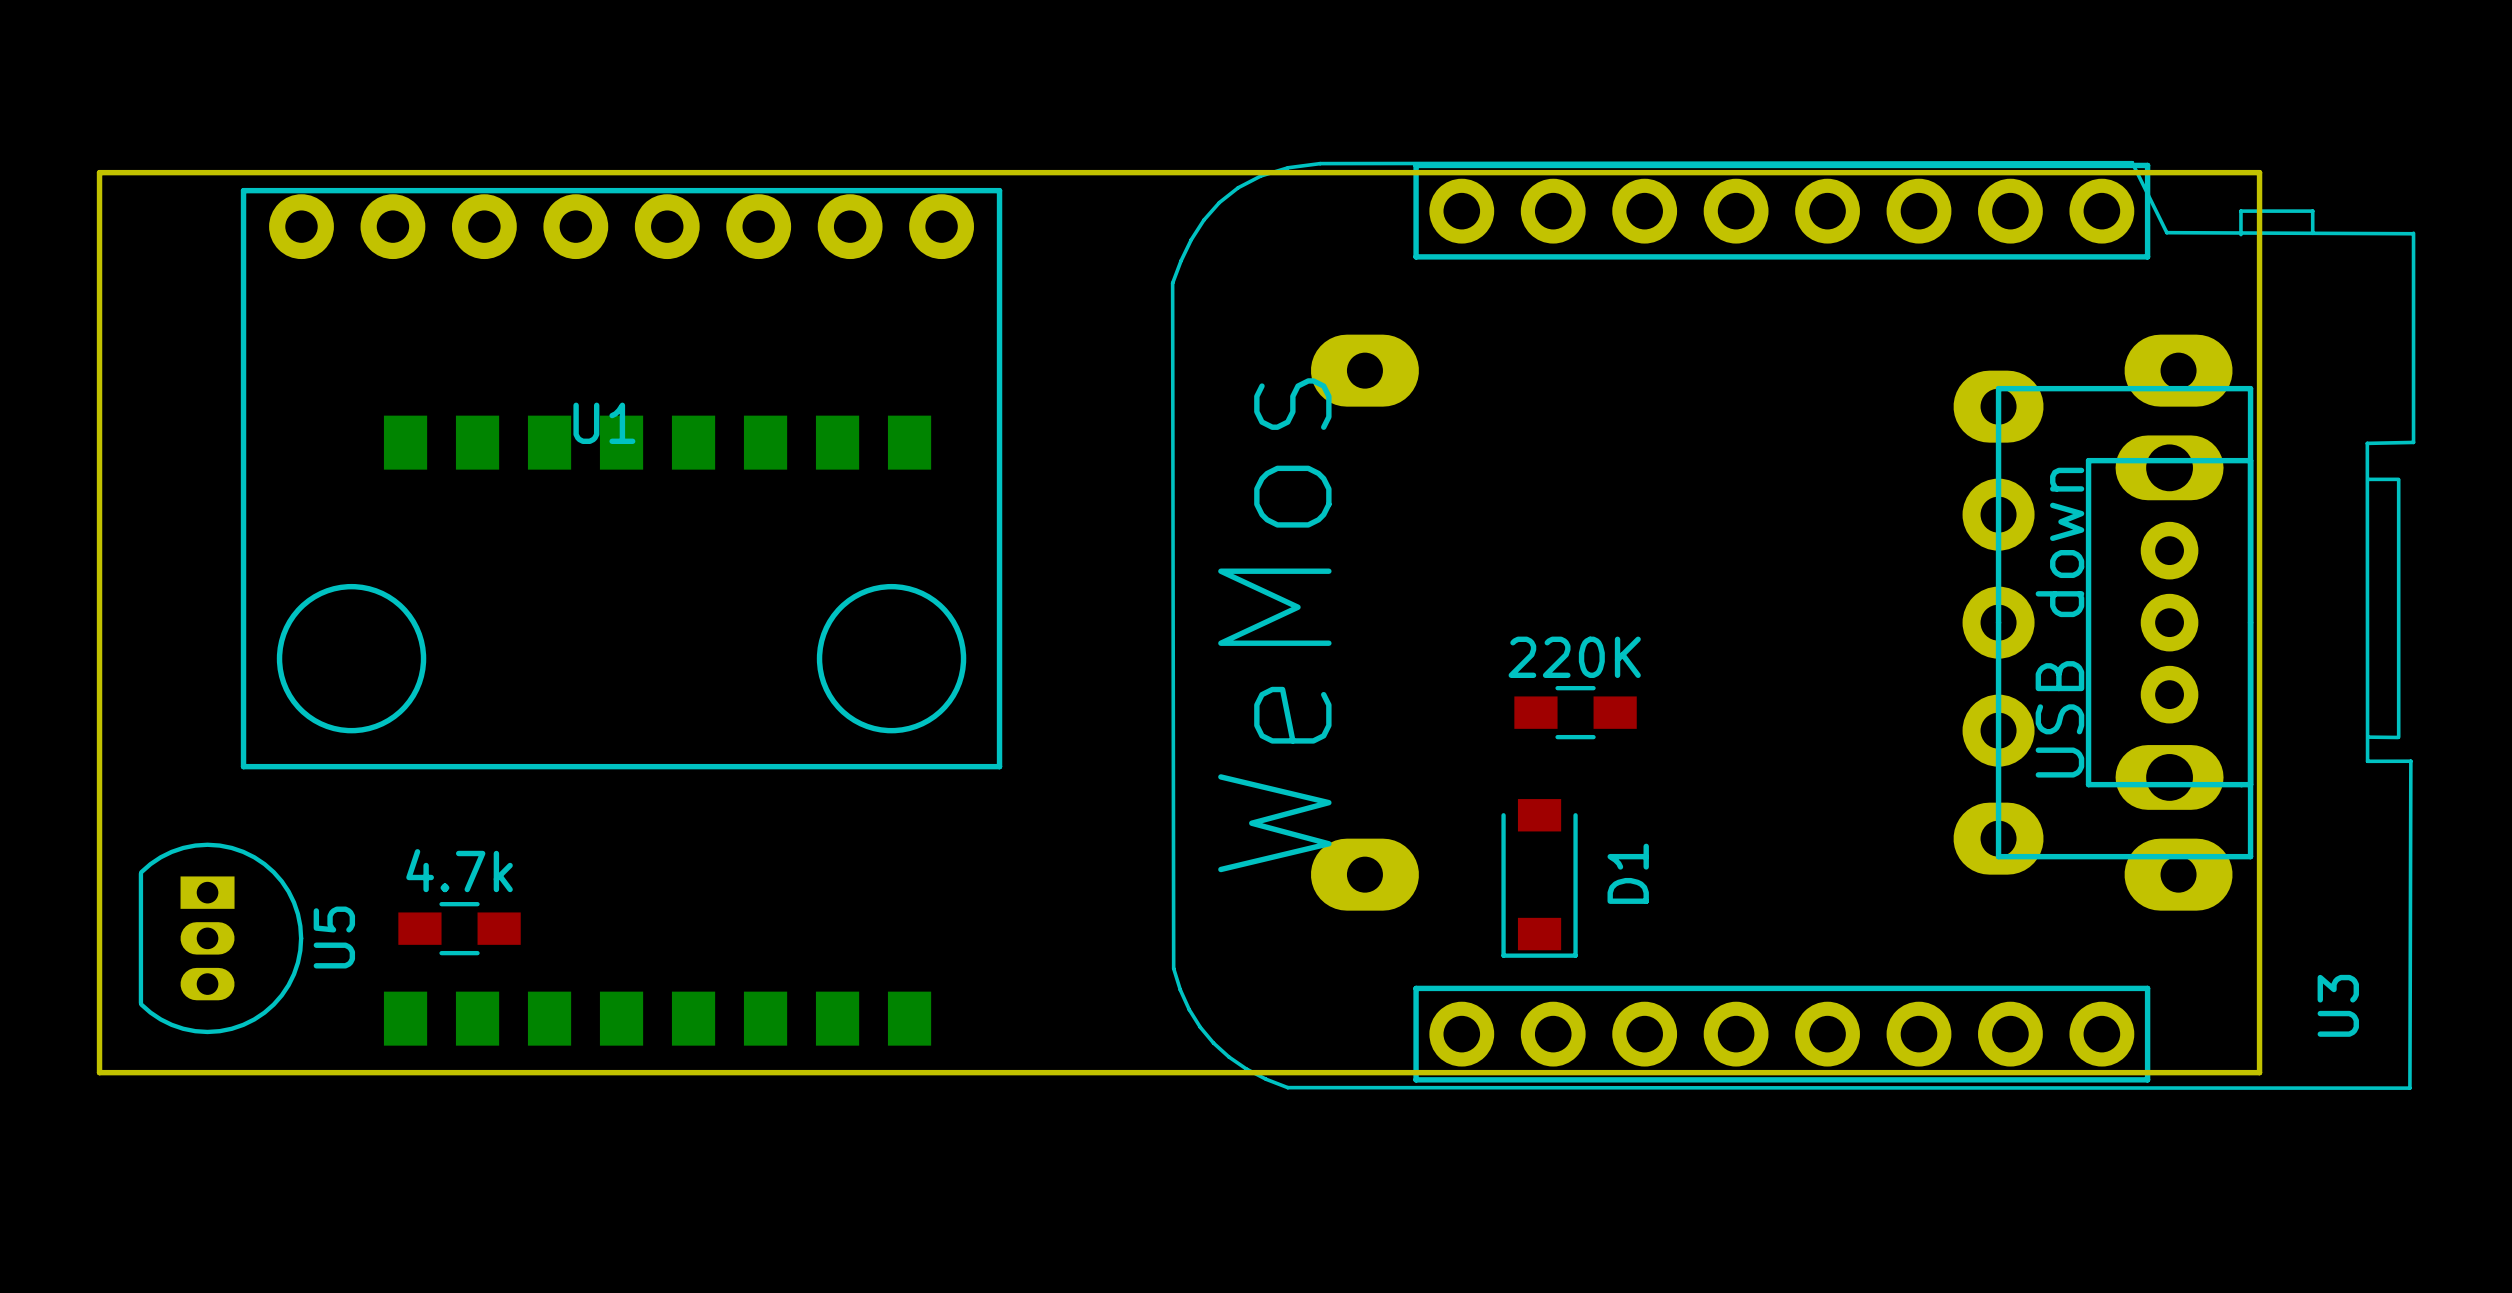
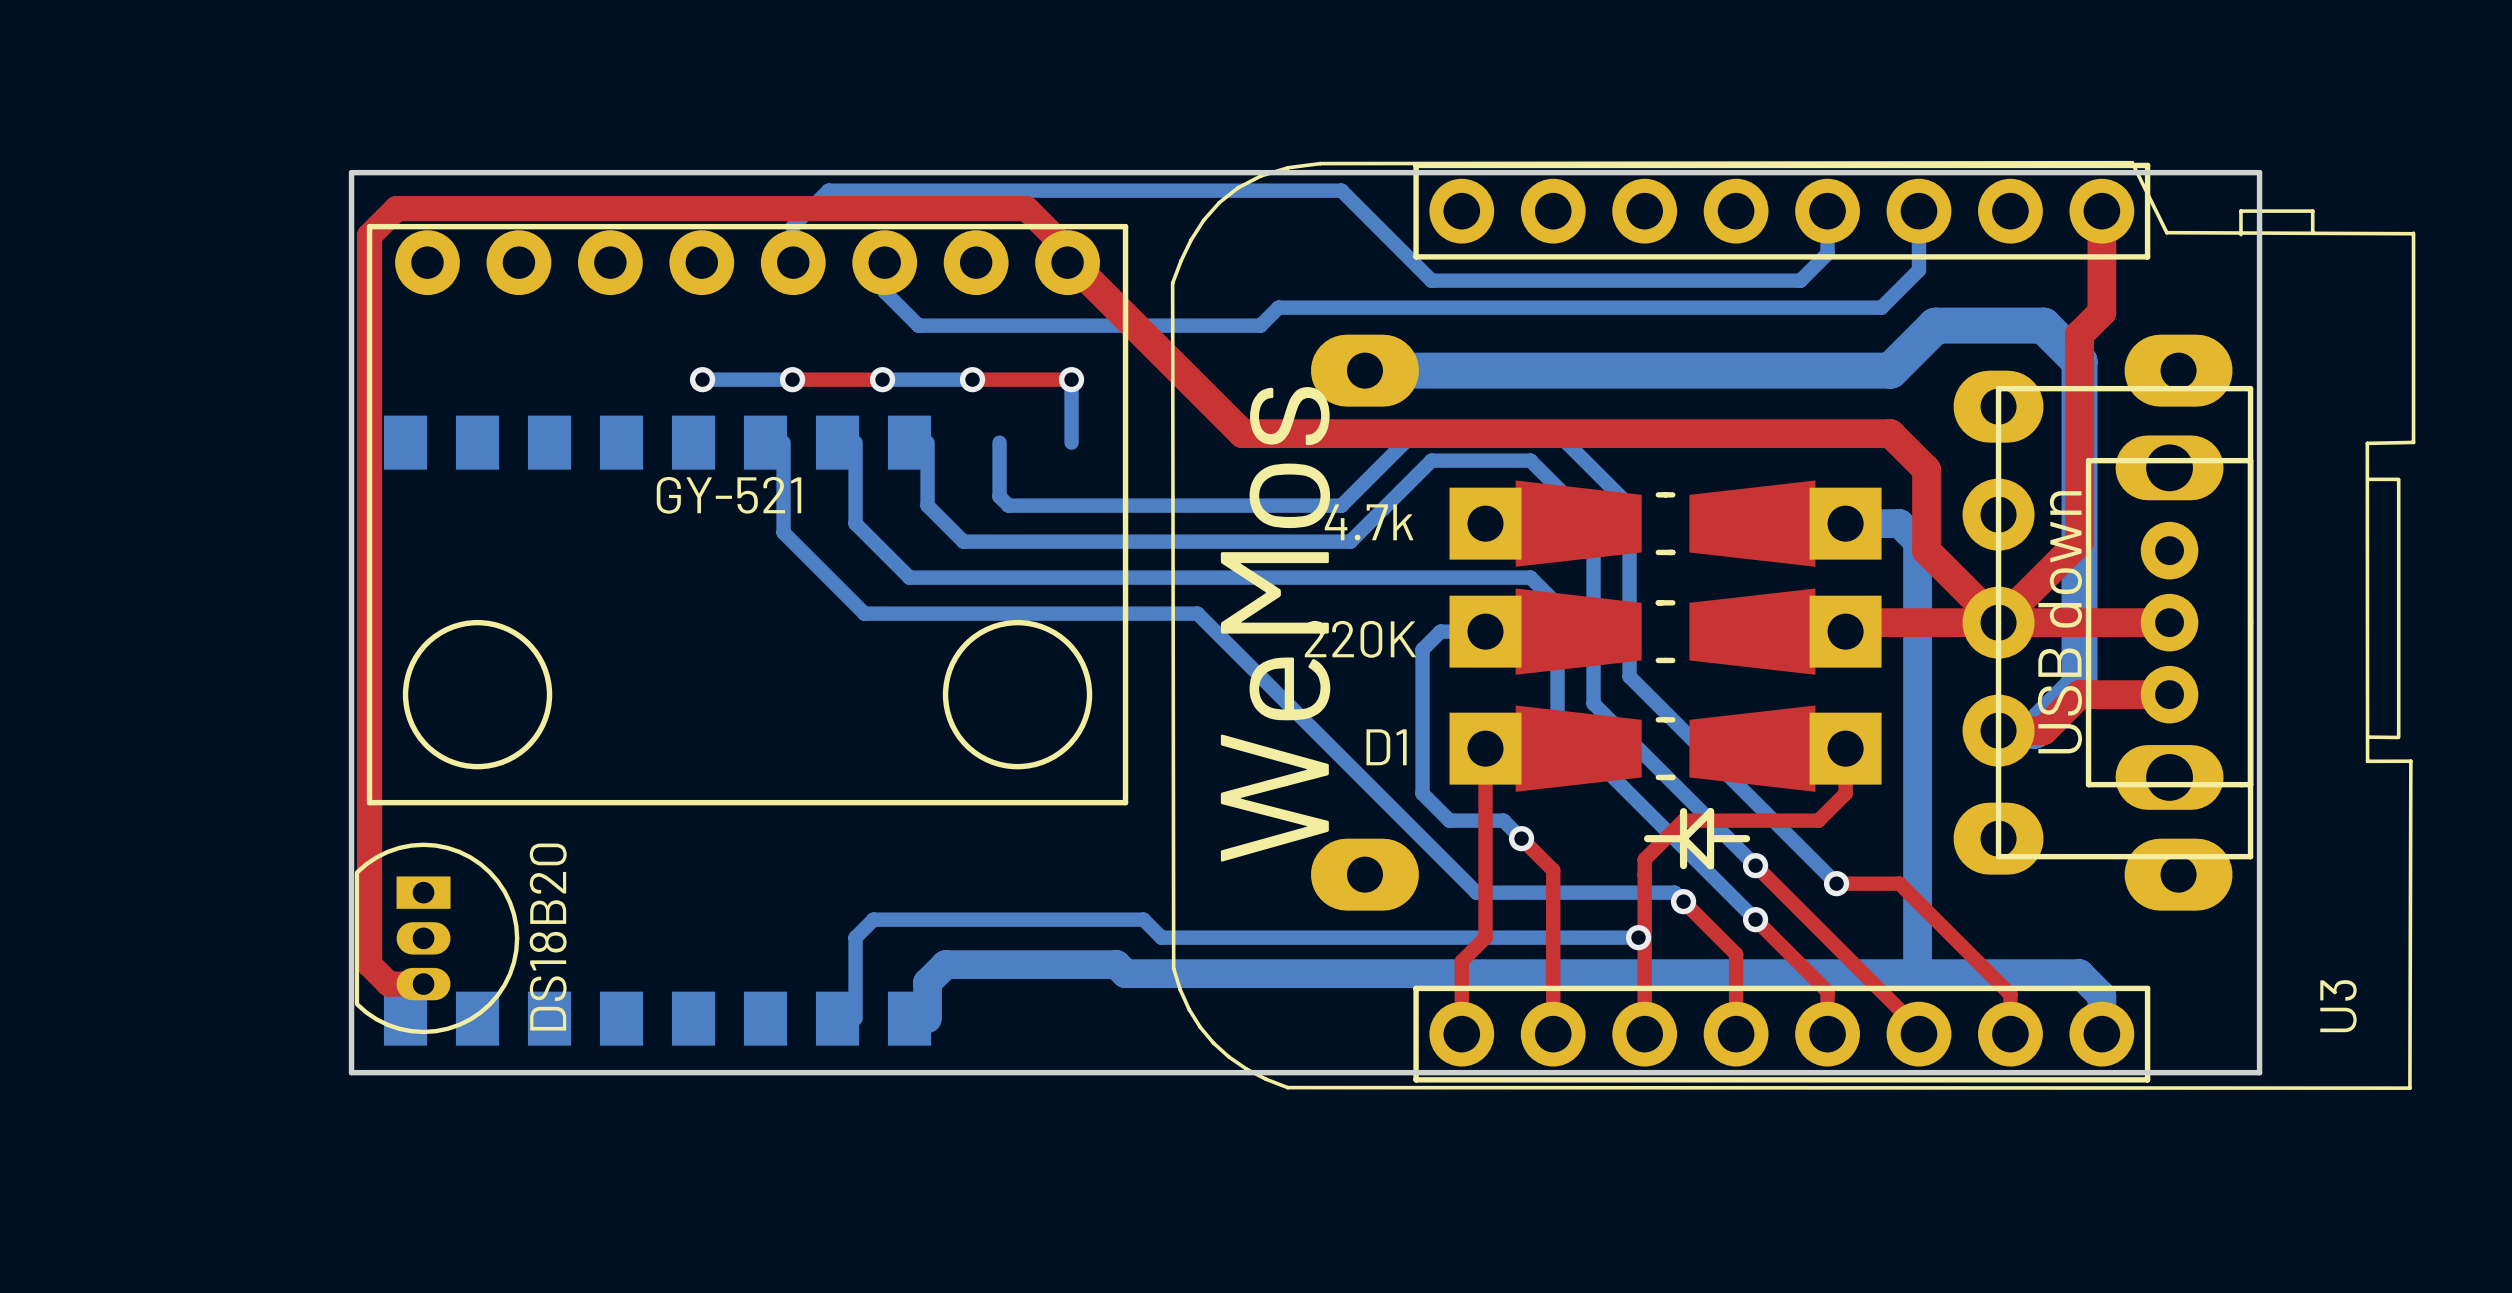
board edge: (351, 172) (99, 172) (99, 1072) (351, 1072) -> (351, 172) (351, 1072)
bottom track: none -> (1827, 211) (1827, 253) (1800, 280) (1431, 280) (1341, 190) (828, 190) (793, 225) (793, 262)
bottom track: none -> (1918, 211) (1918, 270) (1881, 307) (1278, 307) (1260, 325) (918, 325) (884, 291) (884, 262)
top track: none -> (2101, 211) (2101, 312) (2079, 334) (2079, 541) (1998, 622) (1926, 550) (1926, 469) (1890, 433) (1242, 433) (1071, 262) (1067, 262) (1067, 249) (1026, 208) (396, 208) (369, 235) (369, 964) (388, 984) (423, 984)
bottom track: none -> (1364, 370) (1890, 370) (1935, 325) (2043, 325) (2079, 361) (2079, 685) (2034, 730) (1980, 730)
bottom track: none -> (702, 379) (792, 379)
via: none -> (702, 379)
top track: none -> (792, 379) (882, 379)
via: none -> (792, 379)
bottom track: none -> (882, 379) (972, 379)
via: none -> (882, 379)
top track: none -> (972, 379) (1071, 379)
via: none -> (972, 379)
bottom track: none -> (1071, 379) (1071, 442)
via: none -> (1071, 379)
bottom track: none -> (783, 442) (783, 532) (864, 613) (1197, 613) (1476, 892) (1674, 892) (1683, 901)
bottom track: none -> (855, 442) (855, 523) (909, 577) (1530, 577) (1557, 604) (1557, 721) (1755, 919)
bottom track: none -> (927, 442) (927, 505) (963, 541) (1350, 541) (1431, 460) (1530, 460) (1593, 523) (1593, 703) (1755, 865)
bottom track: none -> (999, 442) (999, 496) (1008, 505) (1341, 505) (1413, 433) (1557, 433) (1629, 505) (1629, 676) (1836, 883)
U1: (621, 478) -> none
part: none -> GY-521 (747, 514)
part: none -> 4.7k (1665, 523)
bottom track: none -> (1845, 523) (1899, 523) (1917, 541) (1917, 973)
top track: none -> (2169, 622) (1854, 622) (1845, 631) (1752, 631)
bottom track: none -> (1485, 631) (1440, 631) (1422, 649) (1422, 793) (1449, 820) (1503, 820) (1521, 838)
part: none -> 220K (1665, 631)
top track: none -> (2169, 694) (2079, 694) (2043, 730) (1998, 730)
part: 220K (1575, 712) -> none
top track: none -> (1578, 748) (1485, 748) (1485, 937) (1461, 961) (1461, 1034)
top track: none -> (1752, 748) (1845, 748) (1845, 793) (1818, 820) (1683, 820) (1644, 859) (1644, 1034)
D1 footprint: [1501, 799, 1578, 958] -> [1449, 705, 1882, 792]
line: none -> (1683, 811) (1683, 865)
top track: none -> (1521, 838) (1553, 870) (1553, 1034)
via: none -> (1521, 838)
line: none -> (1647, 838) (1683, 838)
line: none -> (1683, 838) (1710, 811) (1710, 865) (1683, 838)
line: none -> (1710, 838) (1746, 838)
top track: none -> (1755, 865) (1918, 1029) (1918, 1034)
via: none -> (1755, 865)
part value: 4.7k (459, 870) -> none
D1 name position: D1 (1628, 873) -> D1 (1386, 747)
top track: none -> (1836, 883) (1899, 883) (2010, 994) (2010, 1034)
via: none -> (1836, 883)
top track: none -> (1683, 901) (1736, 954) (1736, 1034)
via: none -> (1683, 901)
part footprint: [398, 902, 521, 956] -> [354, 842, 520, 1035]
top track: none -> (1755, 919) (1827, 991) (1827, 1034)
via: none -> (1755, 919)
text: none -> DS18B20 (548, 937)
bottom track: none -> (1638, 937) (1161, 937) (1143, 919) (873, 919) (855, 937) (855, 1018)
via: none -> (1638, 937)
U5: (221, 938) -> none
bottom track: none -> (927, 1018) (927, 982) (945, 964) (1116, 964) (1125, 973) (2079, 973) (2101, 995) (2101, 1034)

